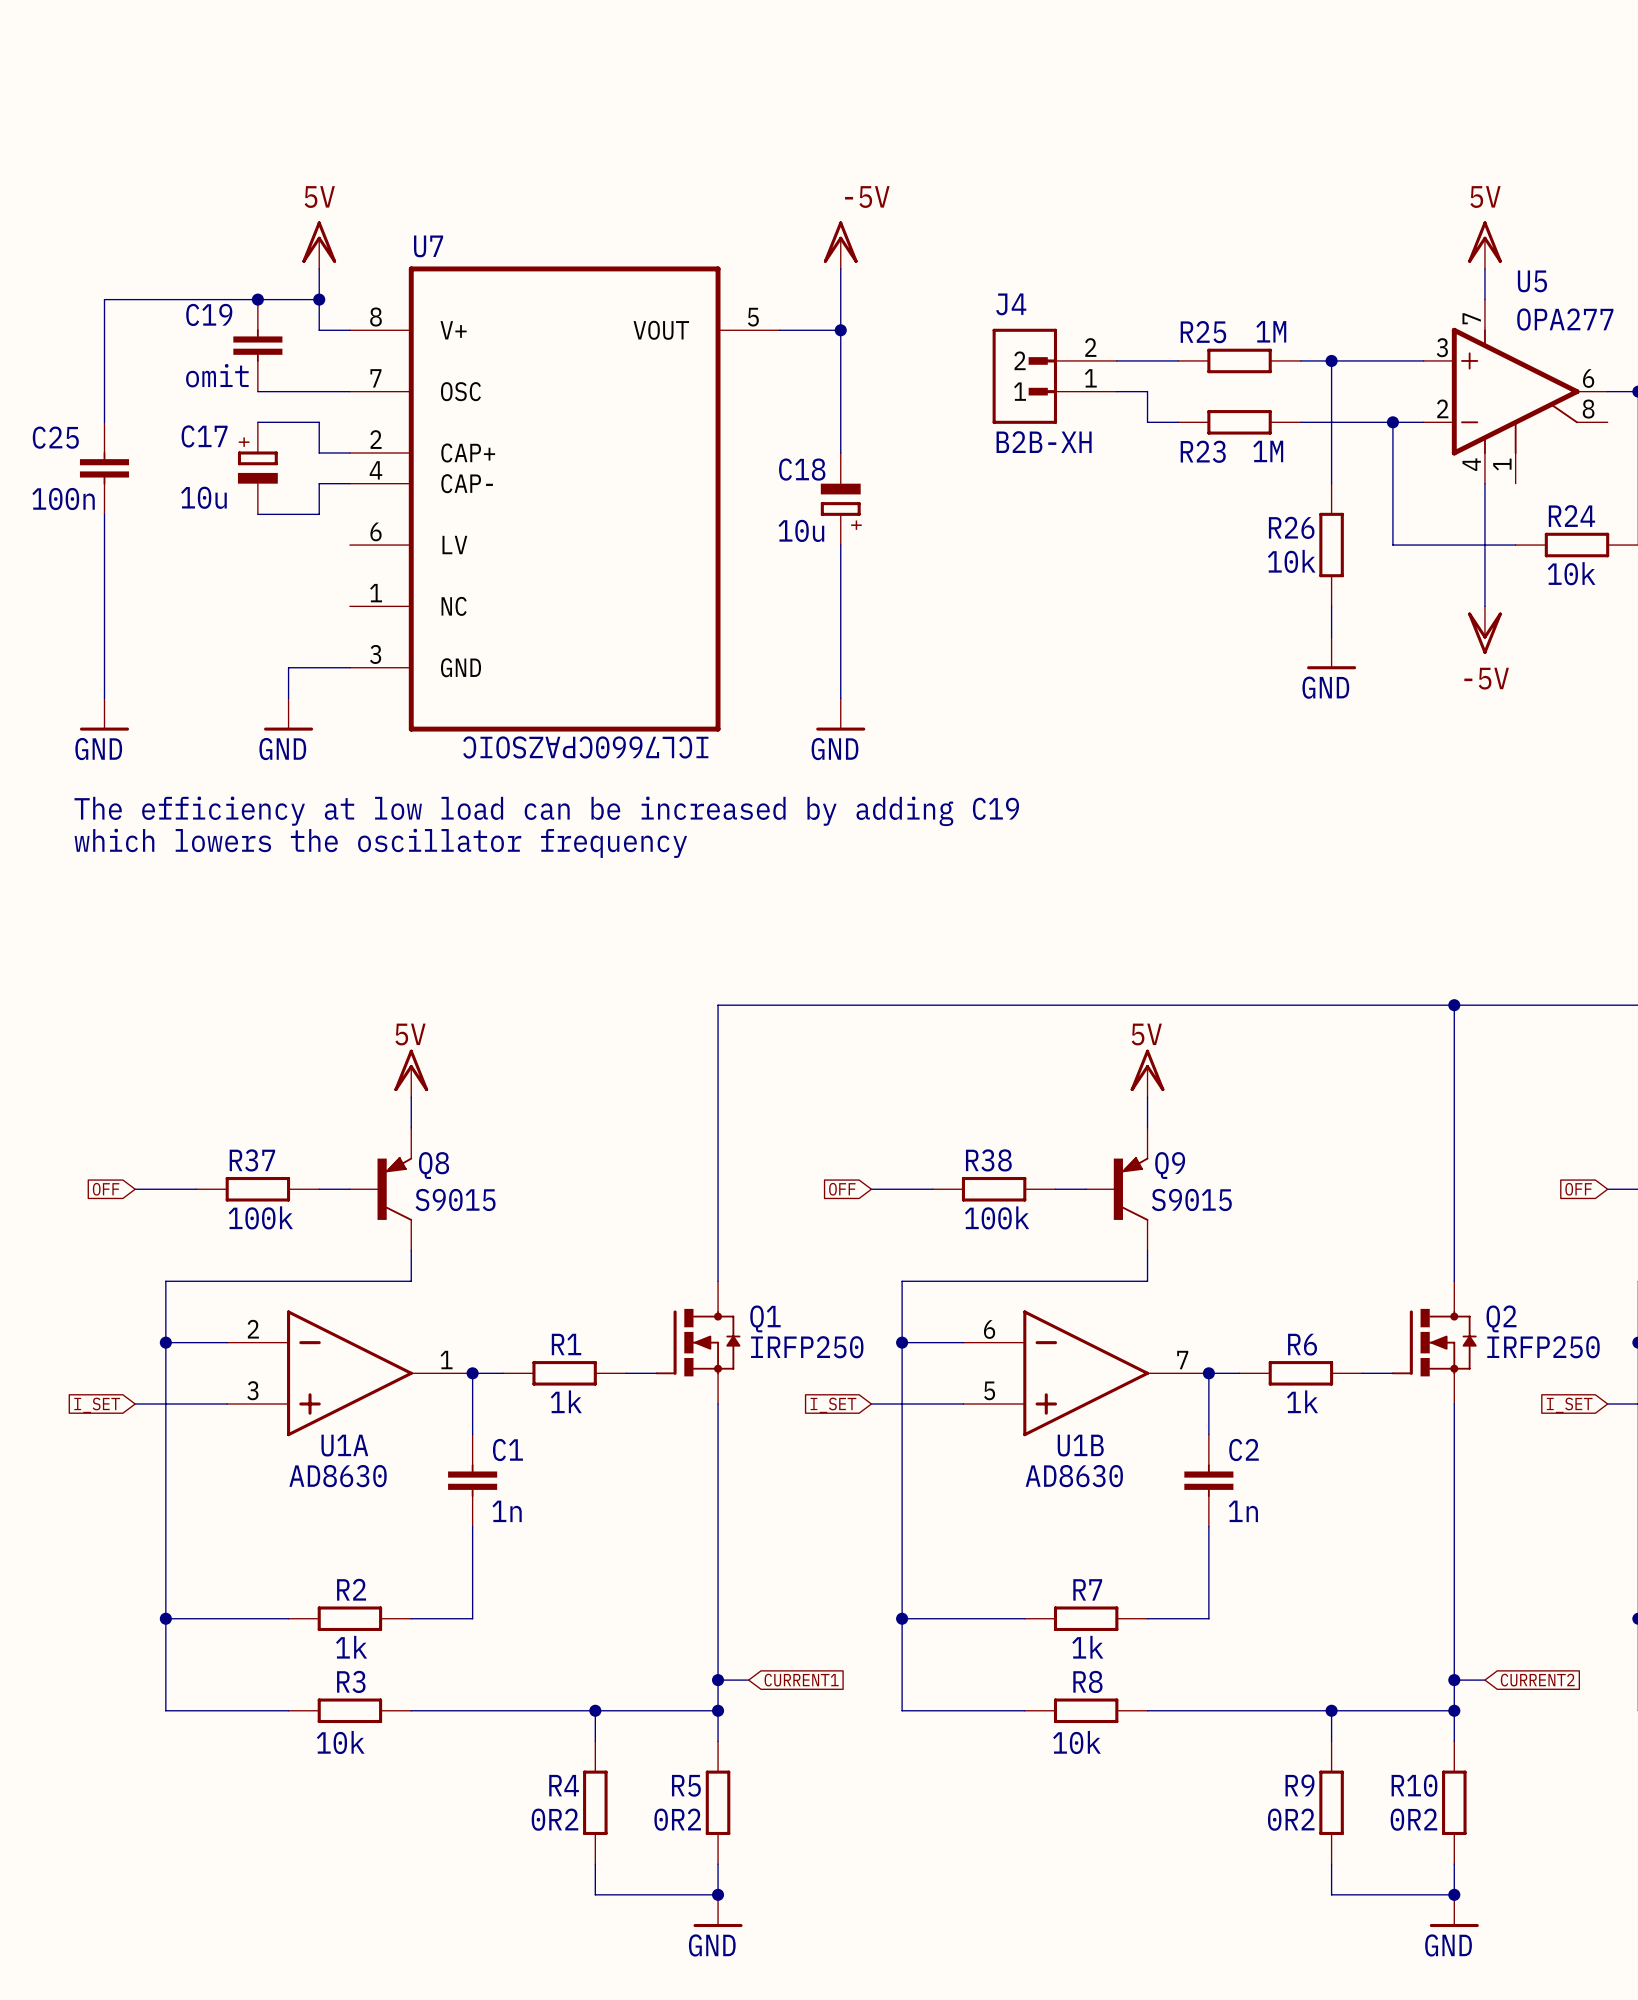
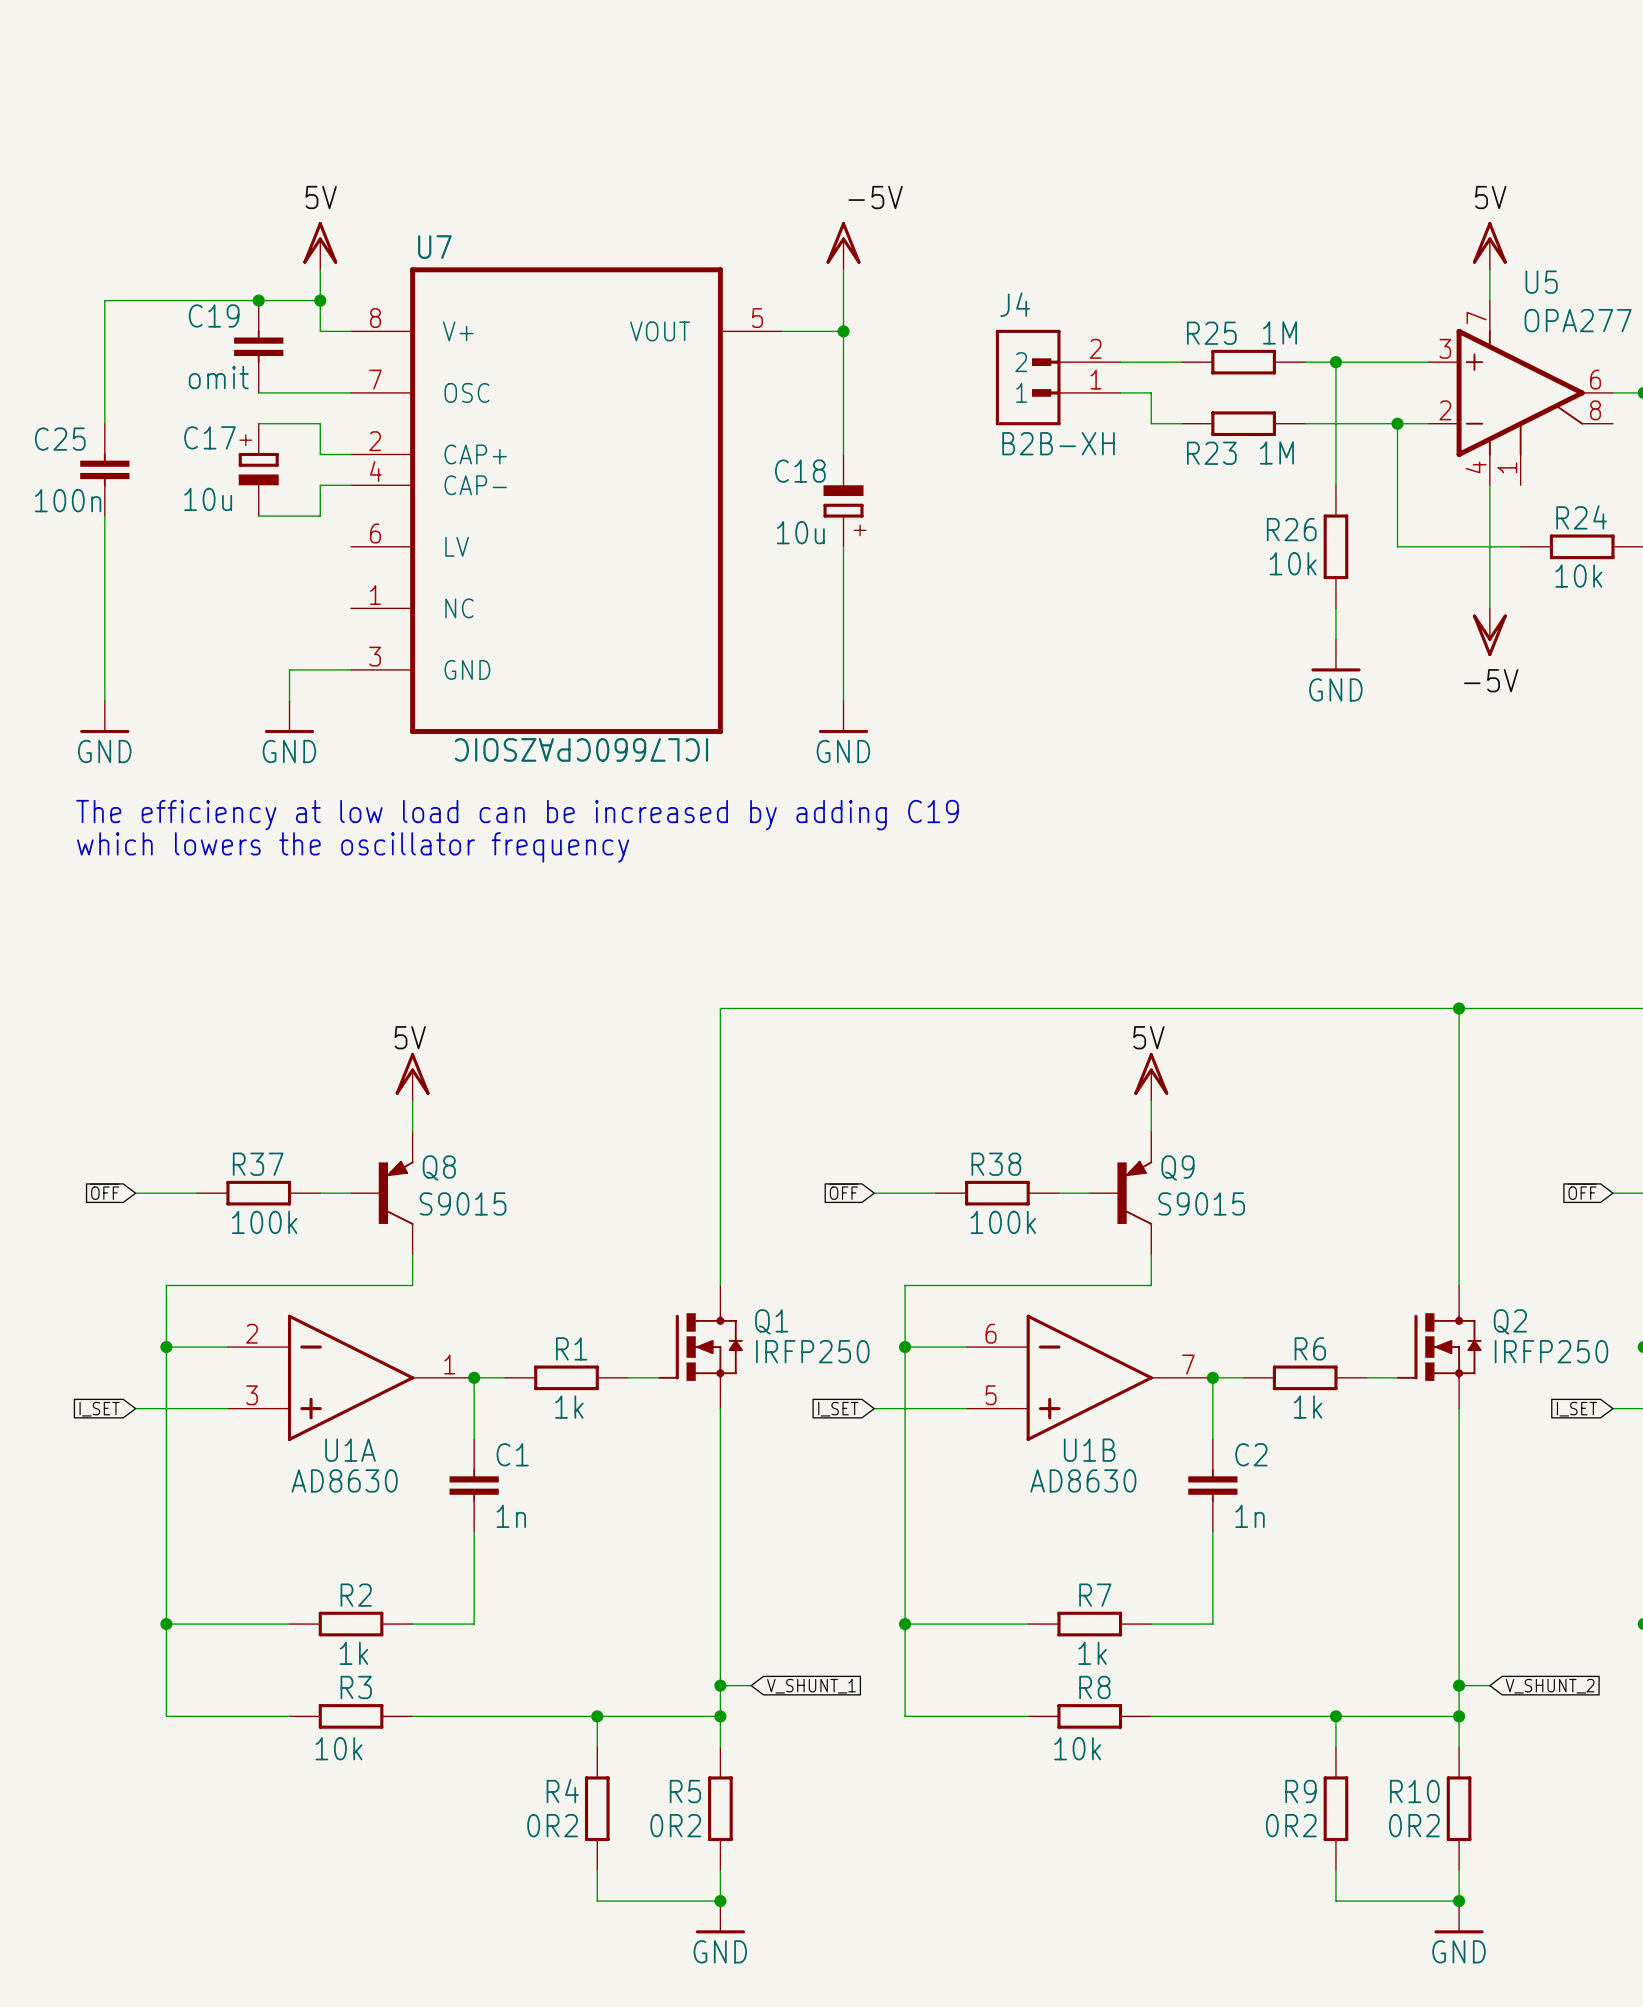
global label: OFF (106, 1189) -> ~{OFF} (104, 1191)
global label: OFF (842, 1189) -> ~{OFF} (843, 1191)
global label: OFF (1578, 1189) -> ~{OFF} (1582, 1191)
global label: CURRENT1 (801, 1680) -> V_SHUNT_1 (811, 1686)
global label: CURRENT2 (1537, 1680) -> V_SHUNT_2 (1550, 1686)

